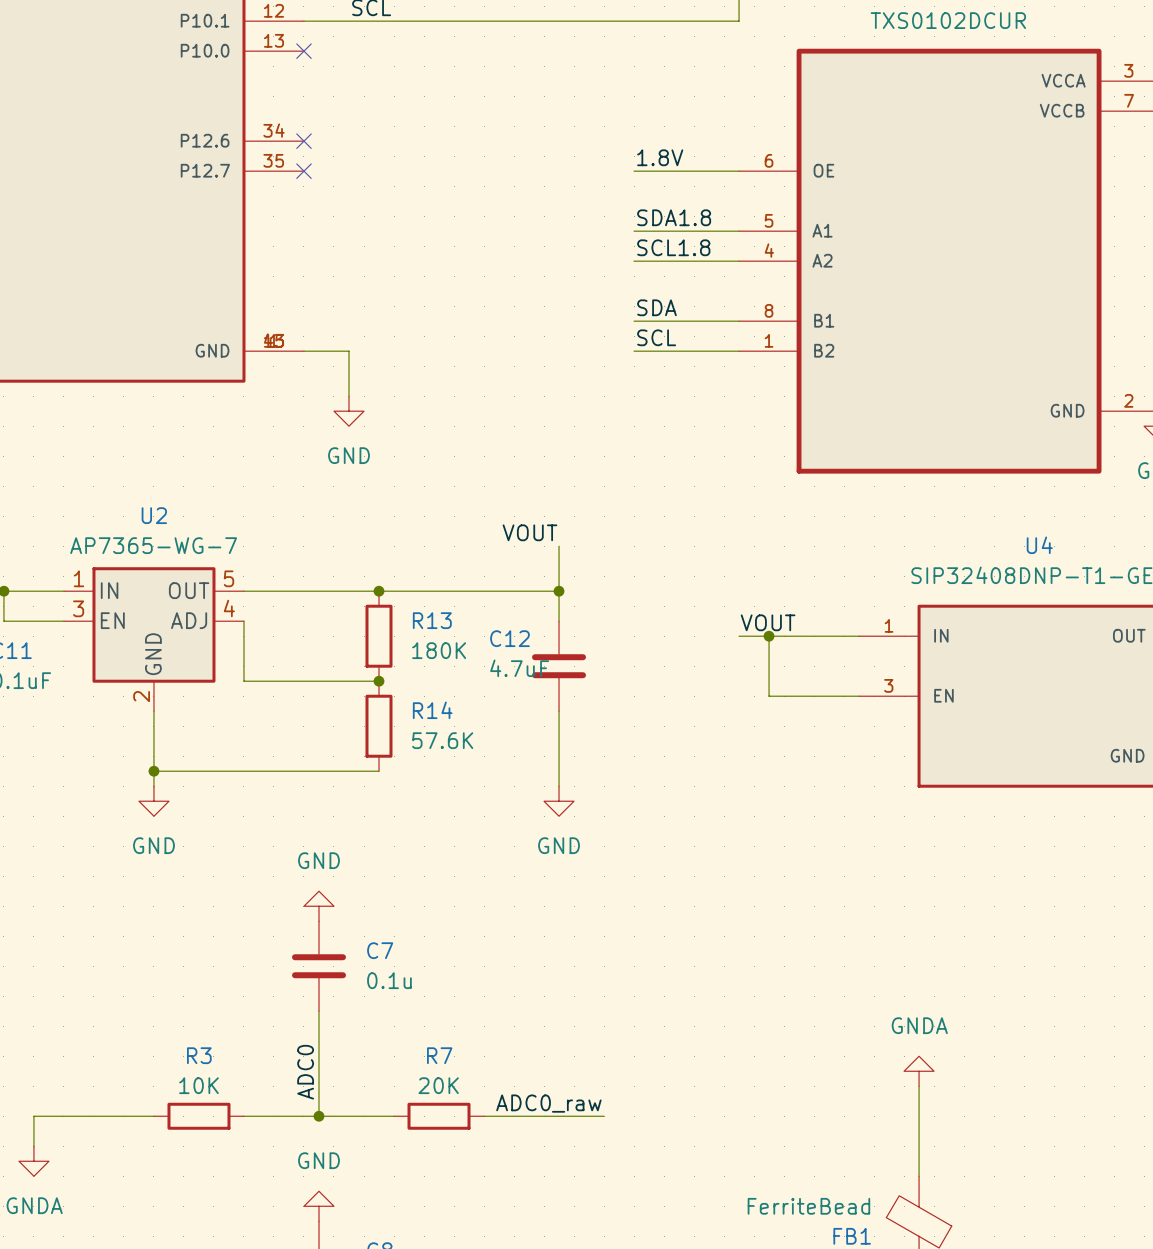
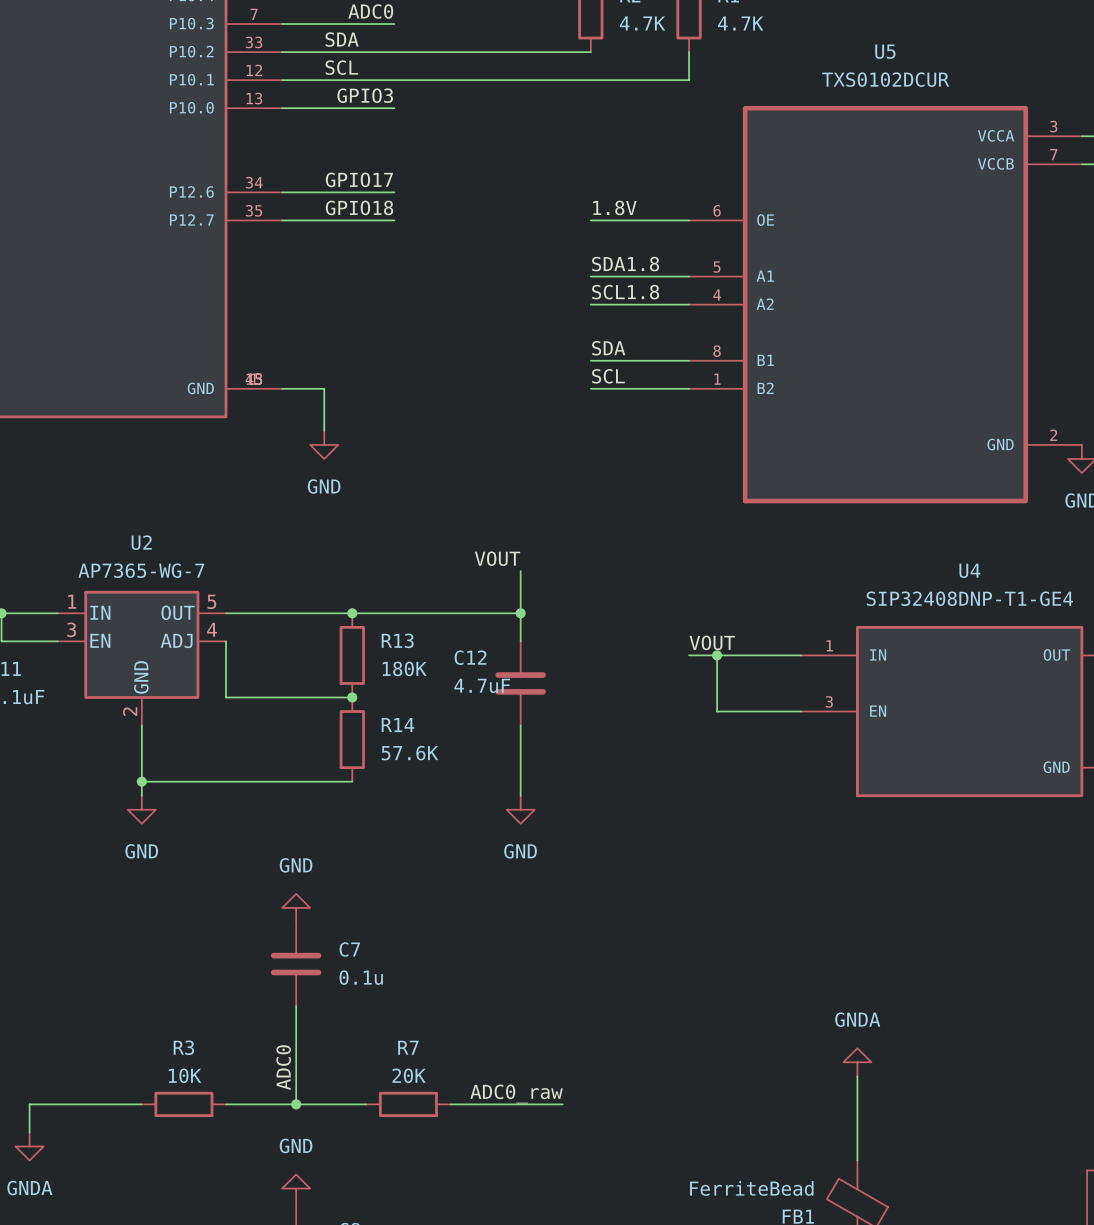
label: none -> GPIO3 (365, 95)
wire: none -> (282, 108) (394, 108)
no-connect mark: (303, 51) -> none
label: none -> GPIO17 (359, 179)
wire: none -> (282, 192) (394, 192)
no-connect mark: (303, 141) -> none
label: none -> GPIO18 (359, 207)
wire: none -> (282, 220) (394, 220)
no-connect mark: (303, 171) -> none

